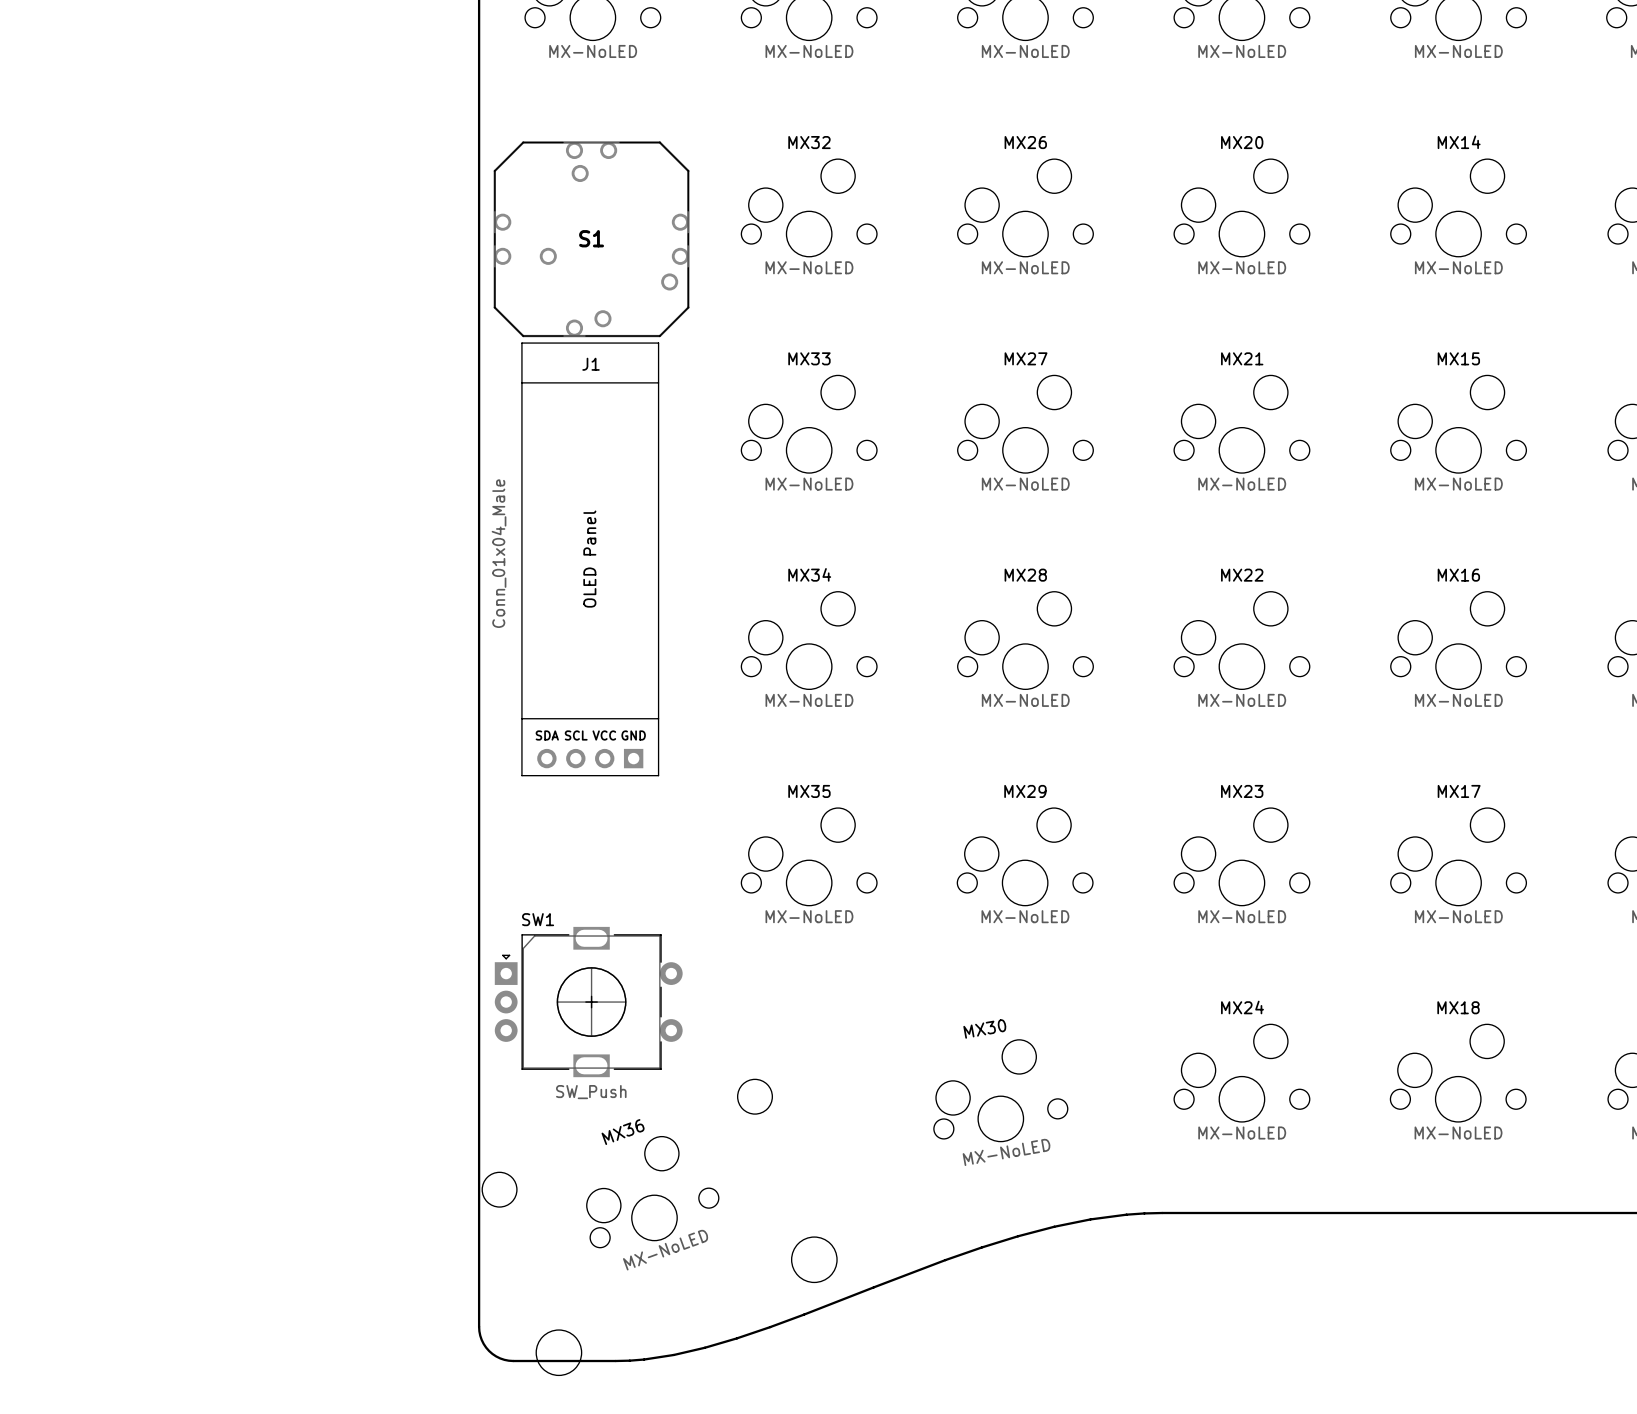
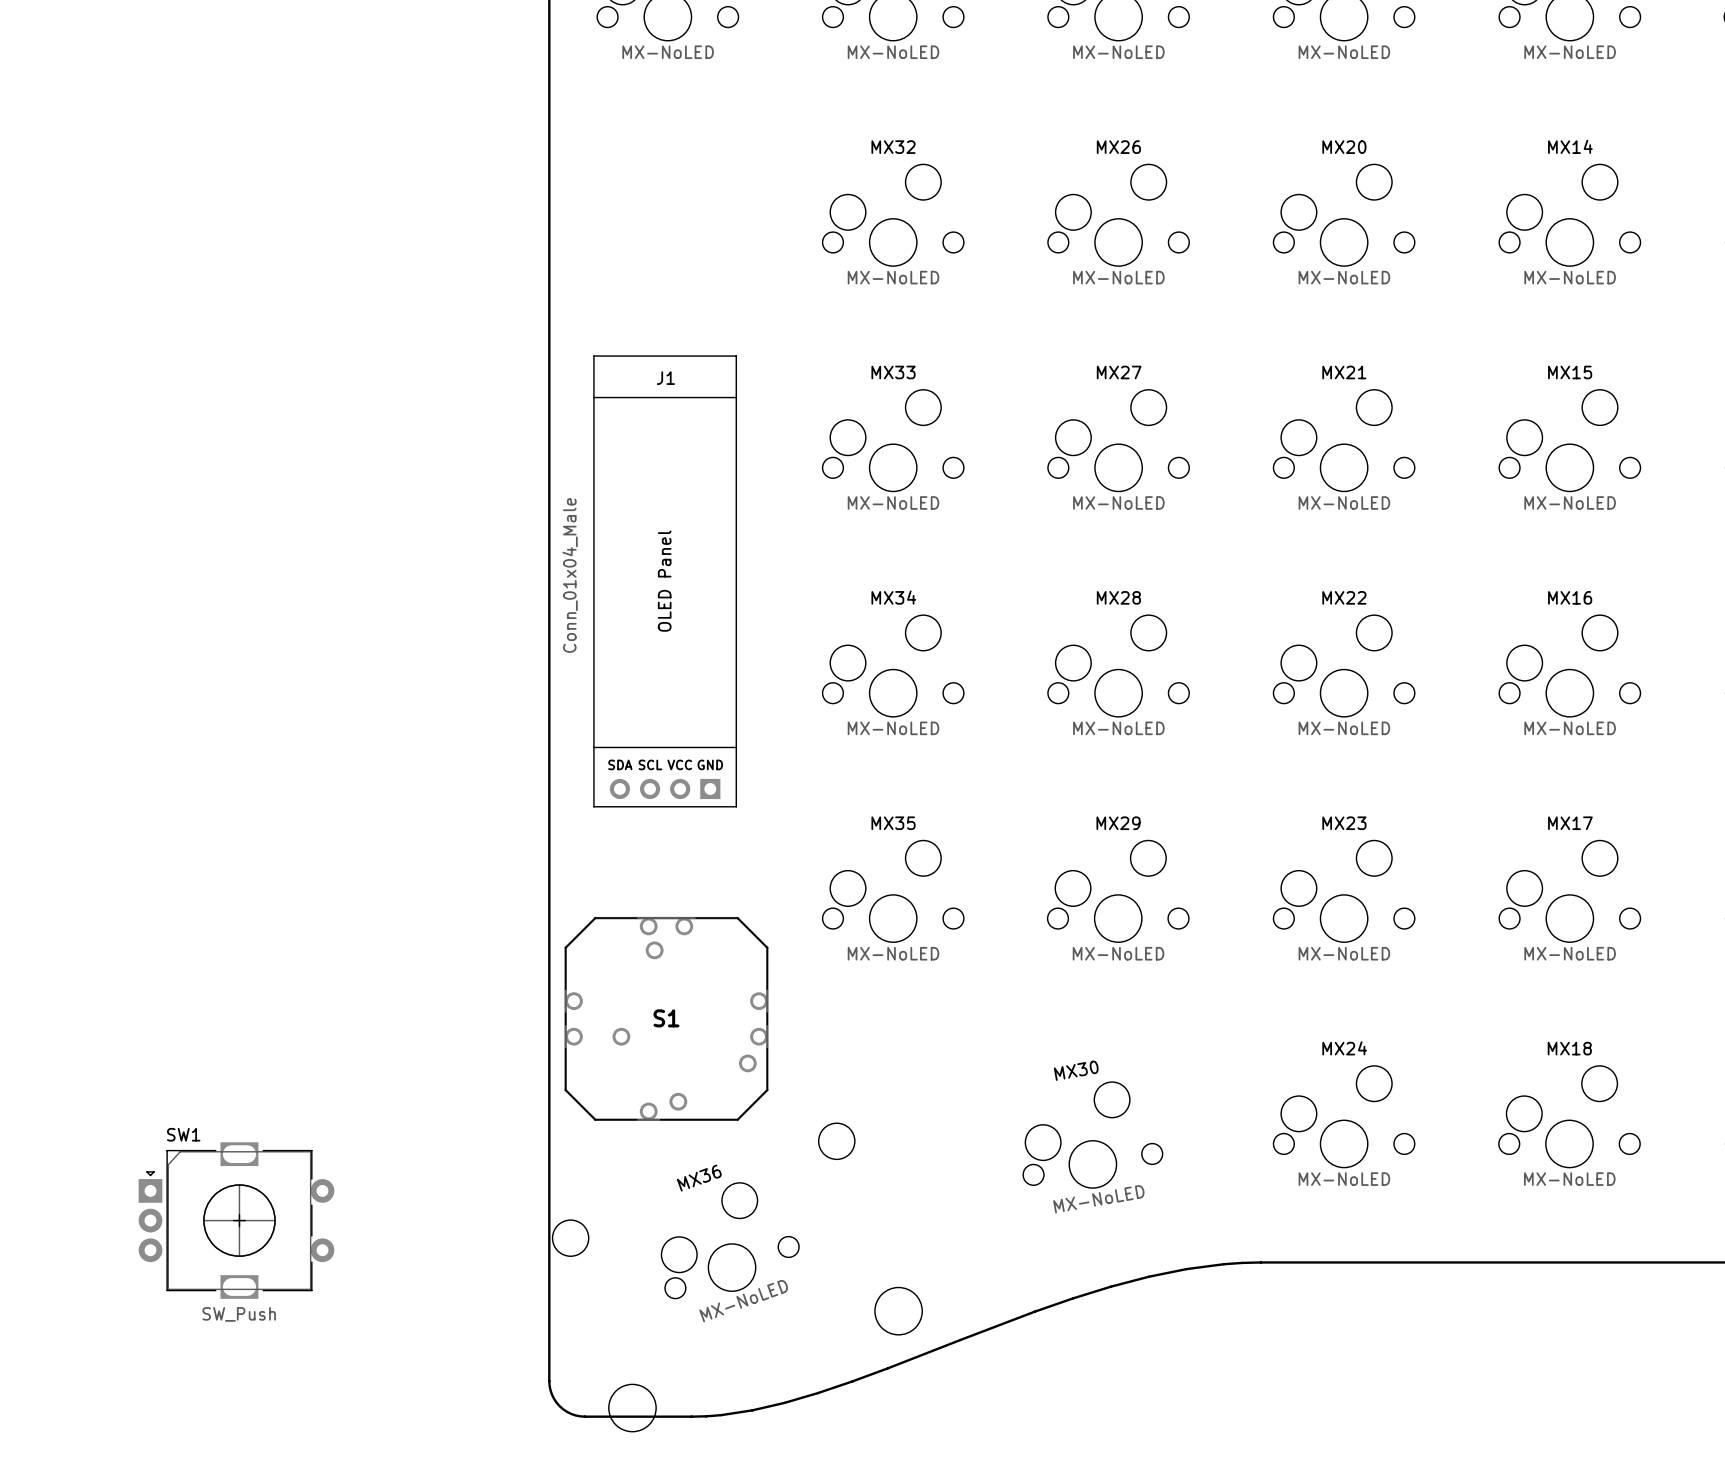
S1 position: (591, 239) -> (666, 1018)
SW1 position: (588, 1002) -> (236, 1220)

